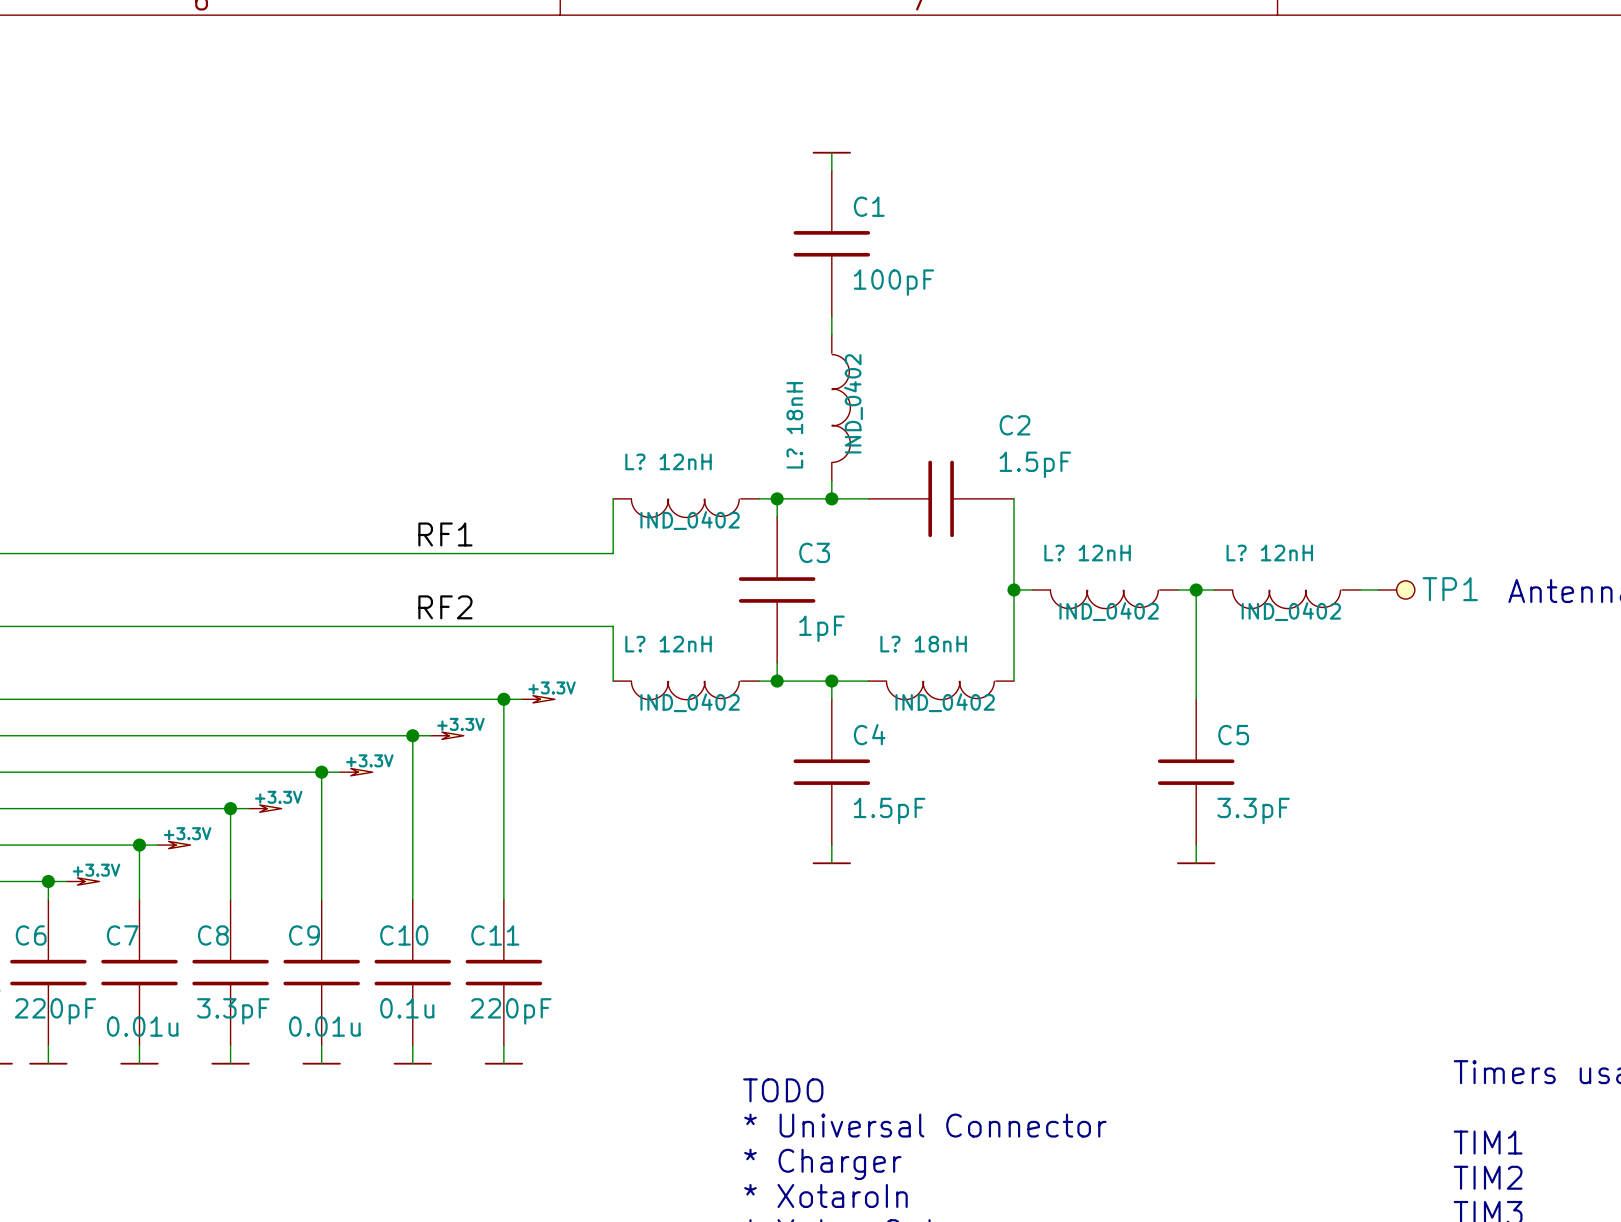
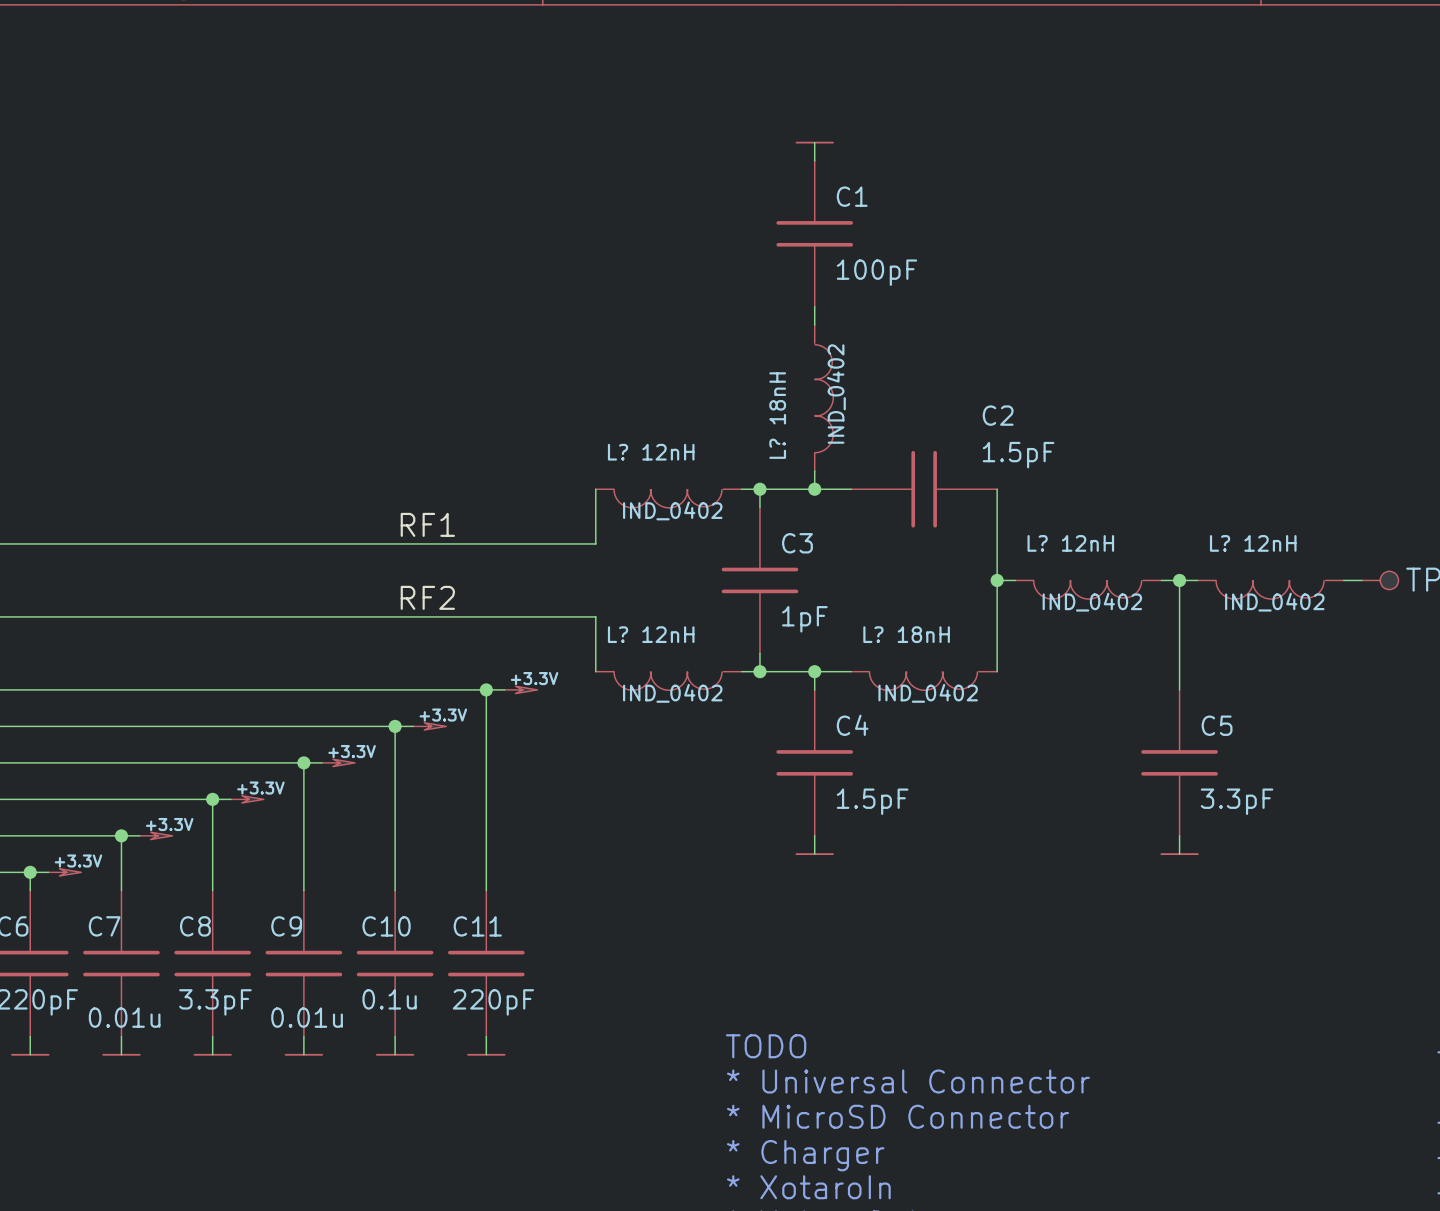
text: none -> TODO (766, 1046)
text: TODO (783, 1090) -> * Universal Connector (908, 1081)
text: * Universal Connector (925, 1125) -> * MicroSD Connector (897, 1116)

